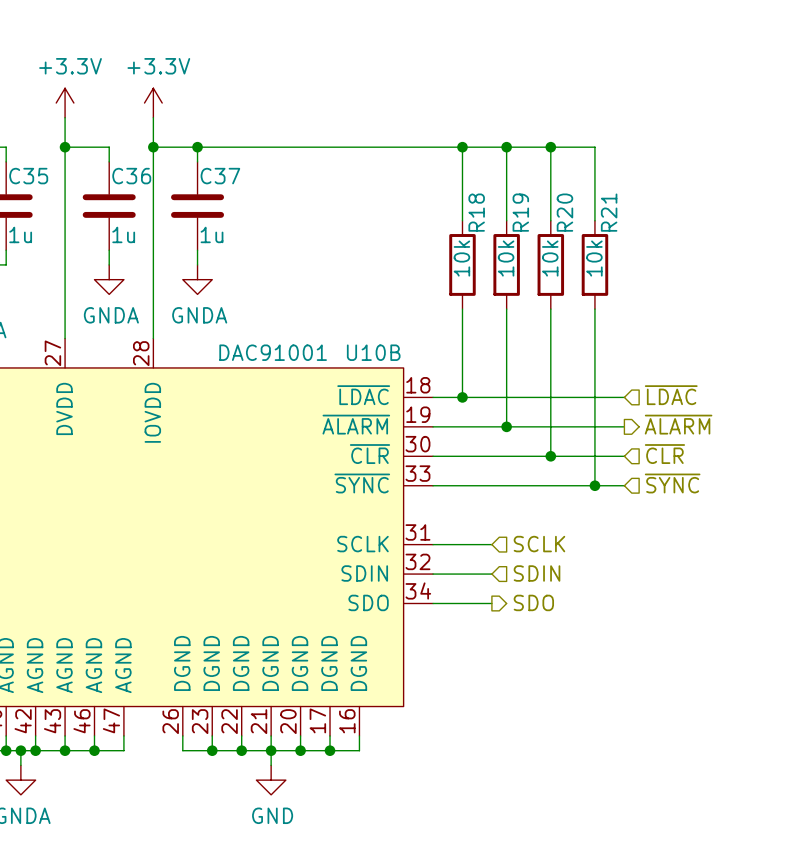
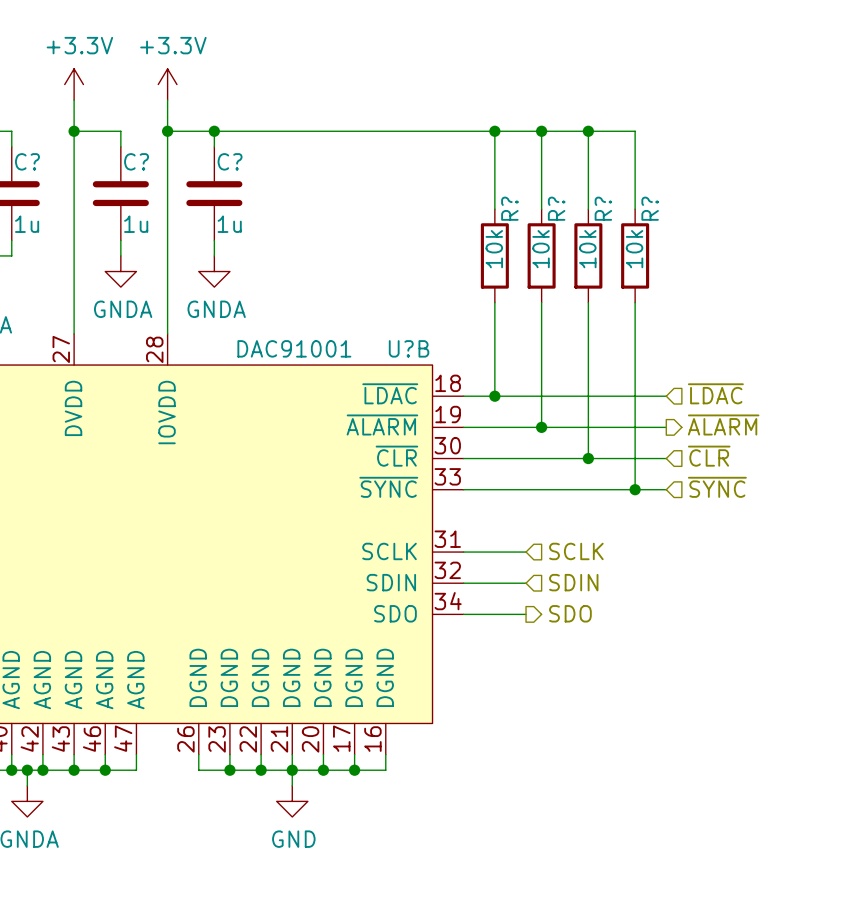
C35 name: C35 (28, 176) -> C? (27, 161)
C36 name: C36 (131, 176) -> C? (136, 161)
C37 name: C37 (220, 176) -> C? (230, 161)
R18 name: R18 (476, 212) -> R? (509, 208)
R19 name: R19 (520, 212) -> R? (556, 208)
R20 name: R20 (564, 212) -> R? (603, 208)
R21 name: R21 (609, 212) -> R? (650, 208)
U10B name: U10B (373, 352) -> U?B (409, 348)

